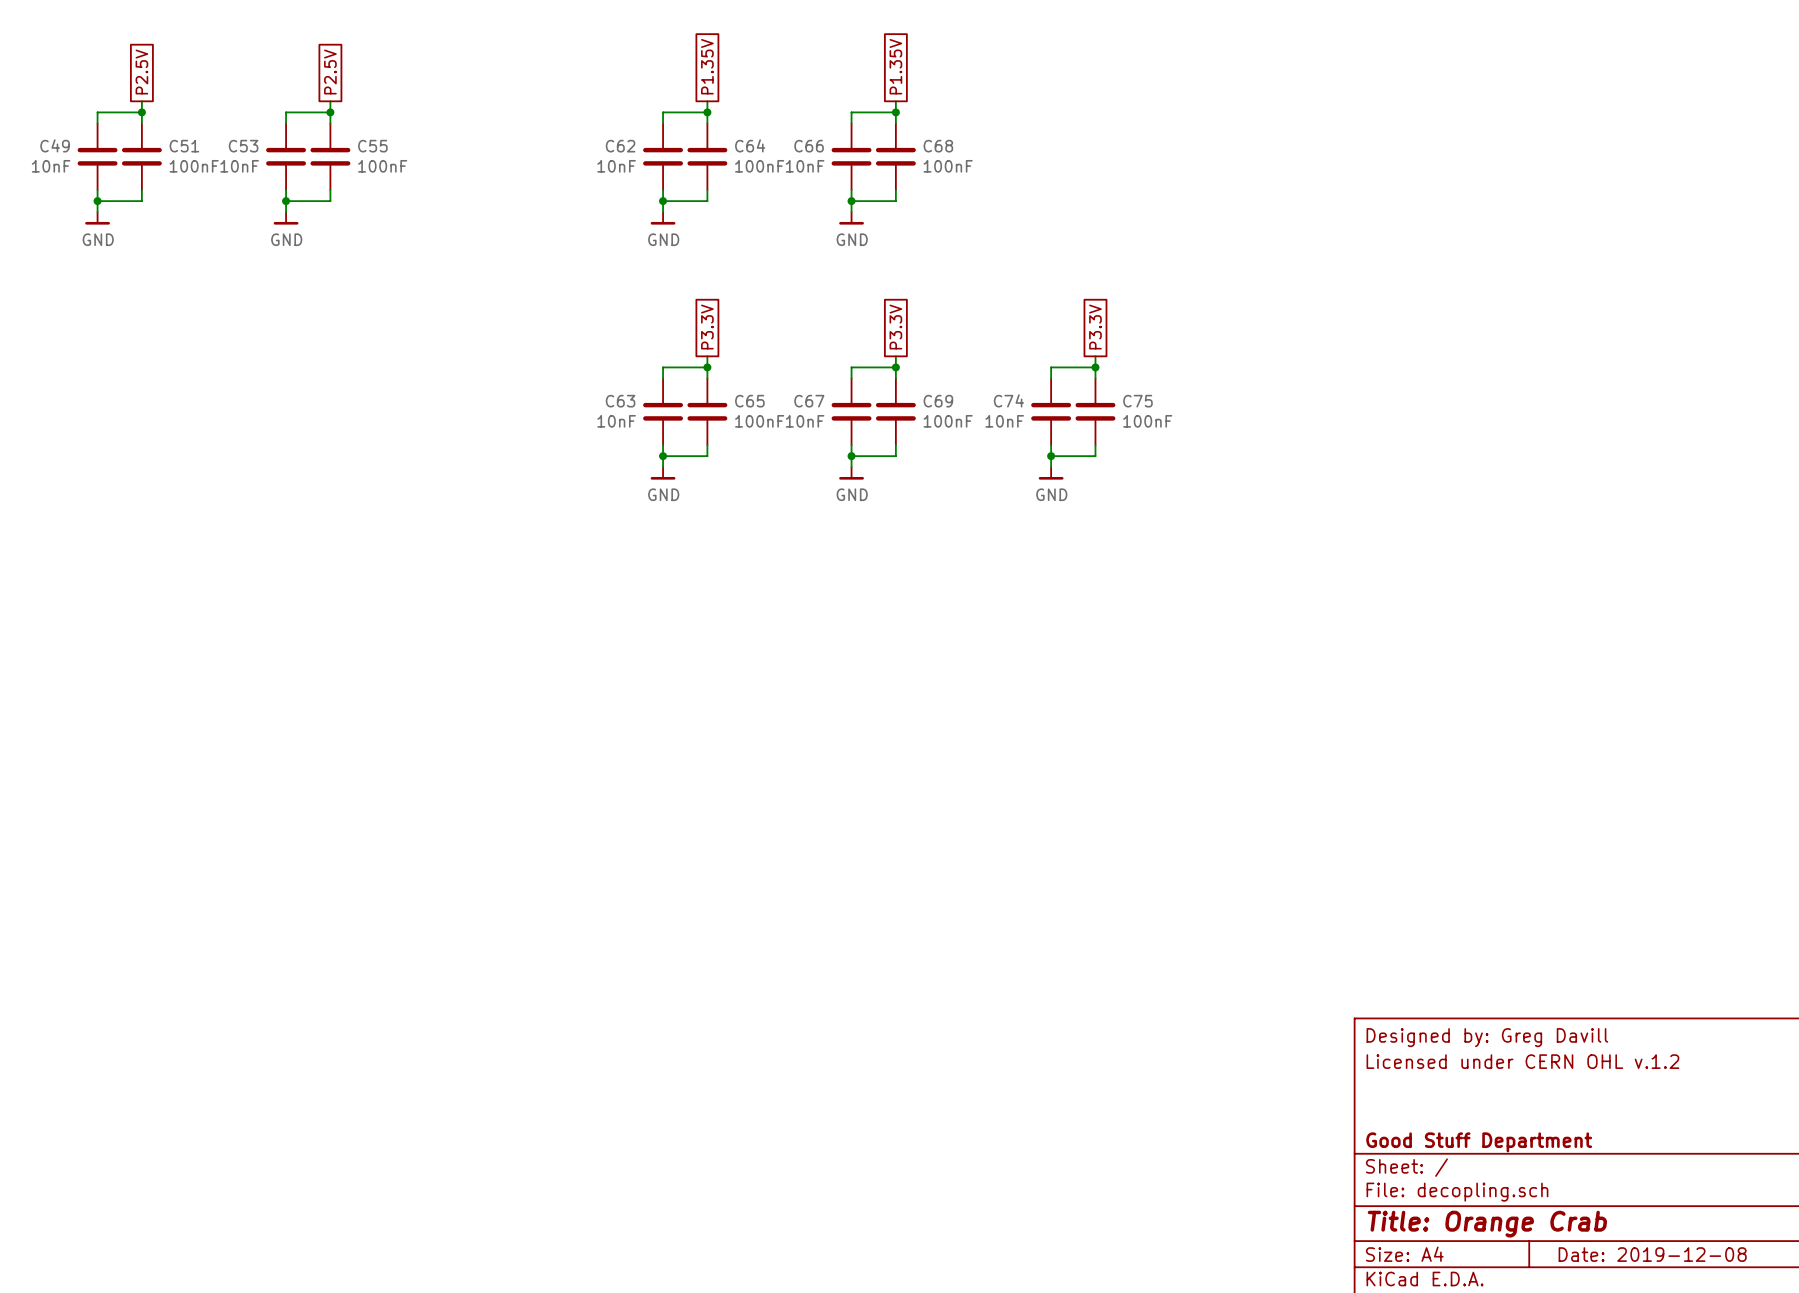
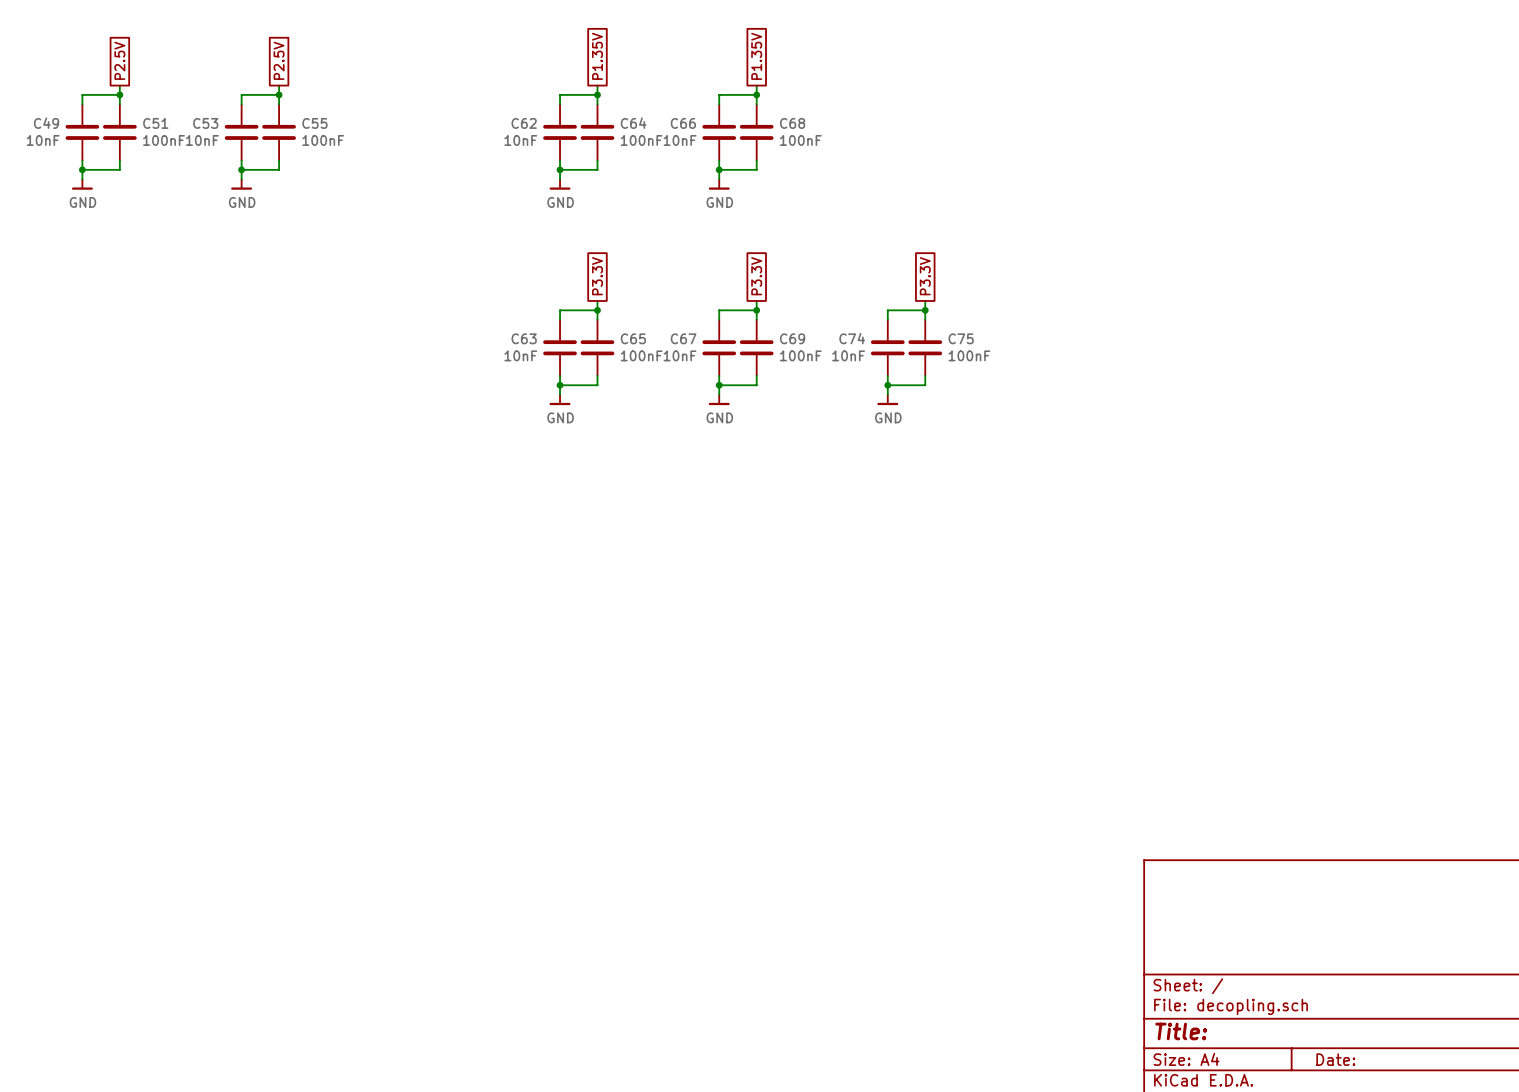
title block: Designed by: Greg Davill (1487, 1037) -> none
title block: Licensed under CERN OHL v.1.2 (1522, 1061) -> none
title block: Good Stuff Department (1479, 1142) -> none
title block: Title: Orange Crab (1487, 1224) -> Title: (1181, 1031)
title block: Date: 2019-12-08 (1652, 1254) -> Date: (1335, 1059)

